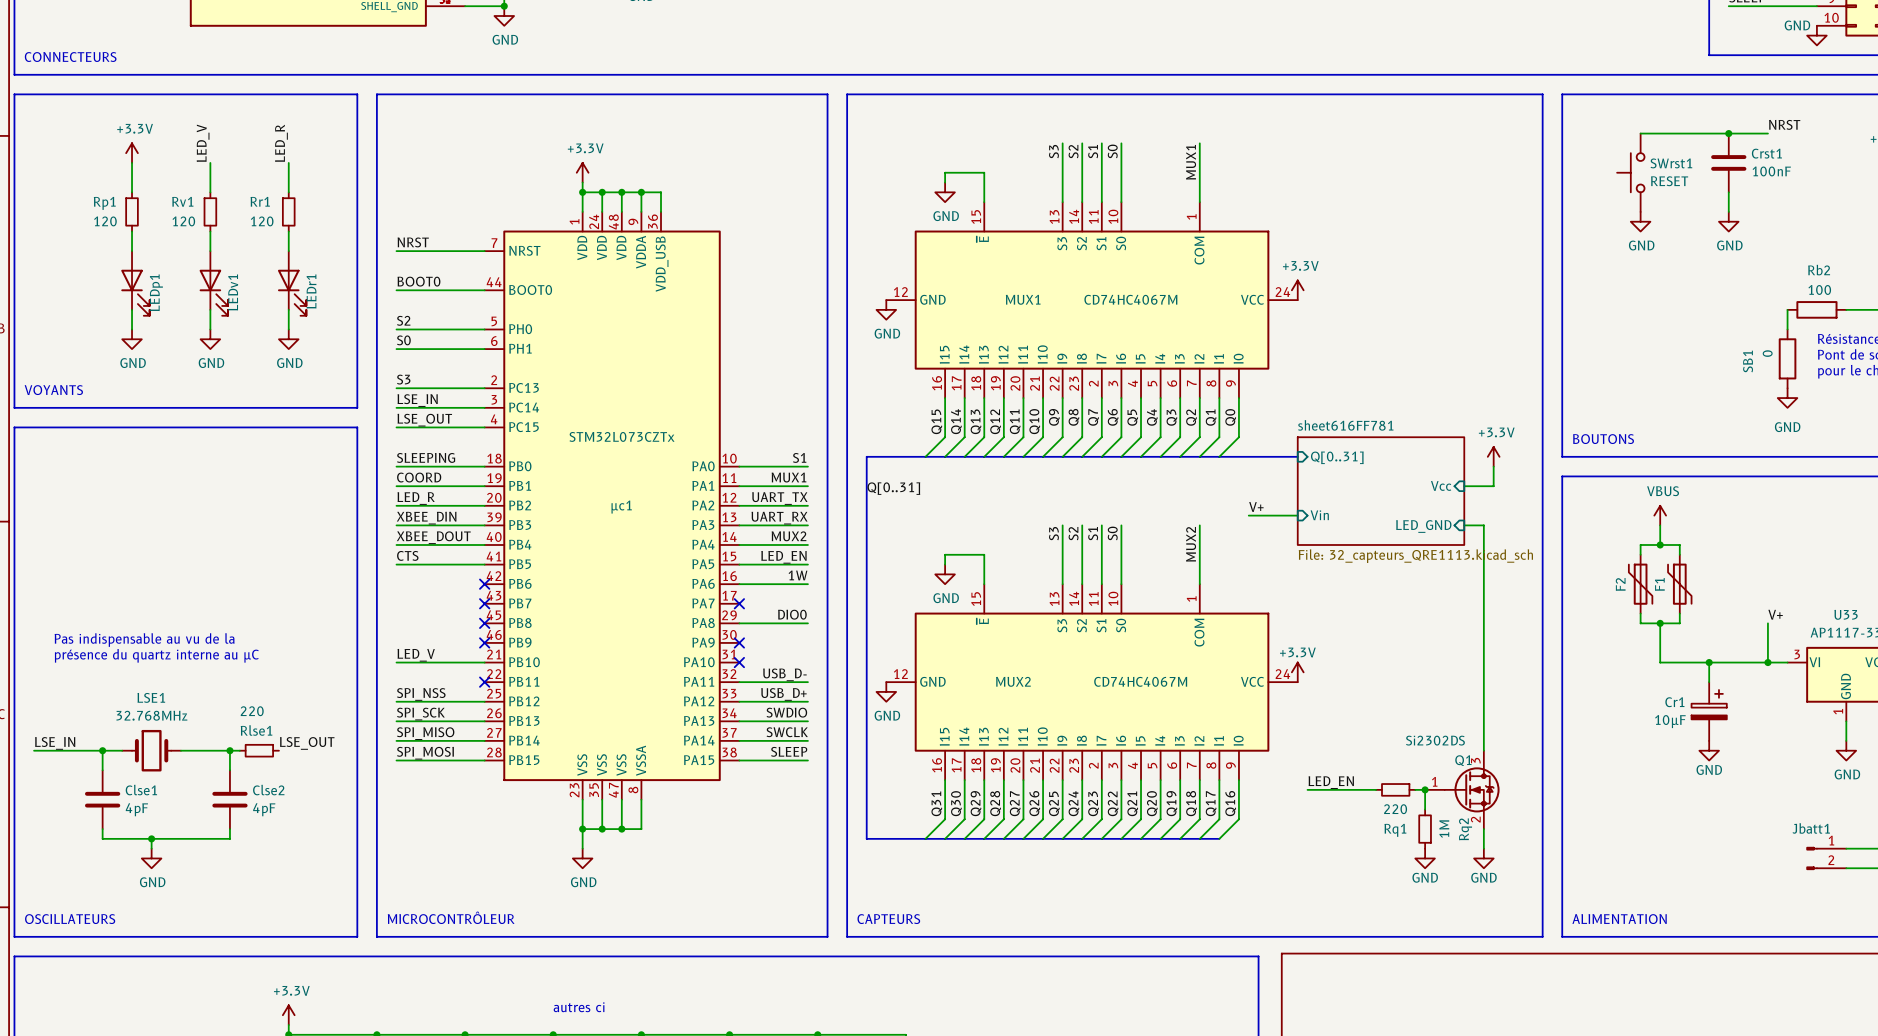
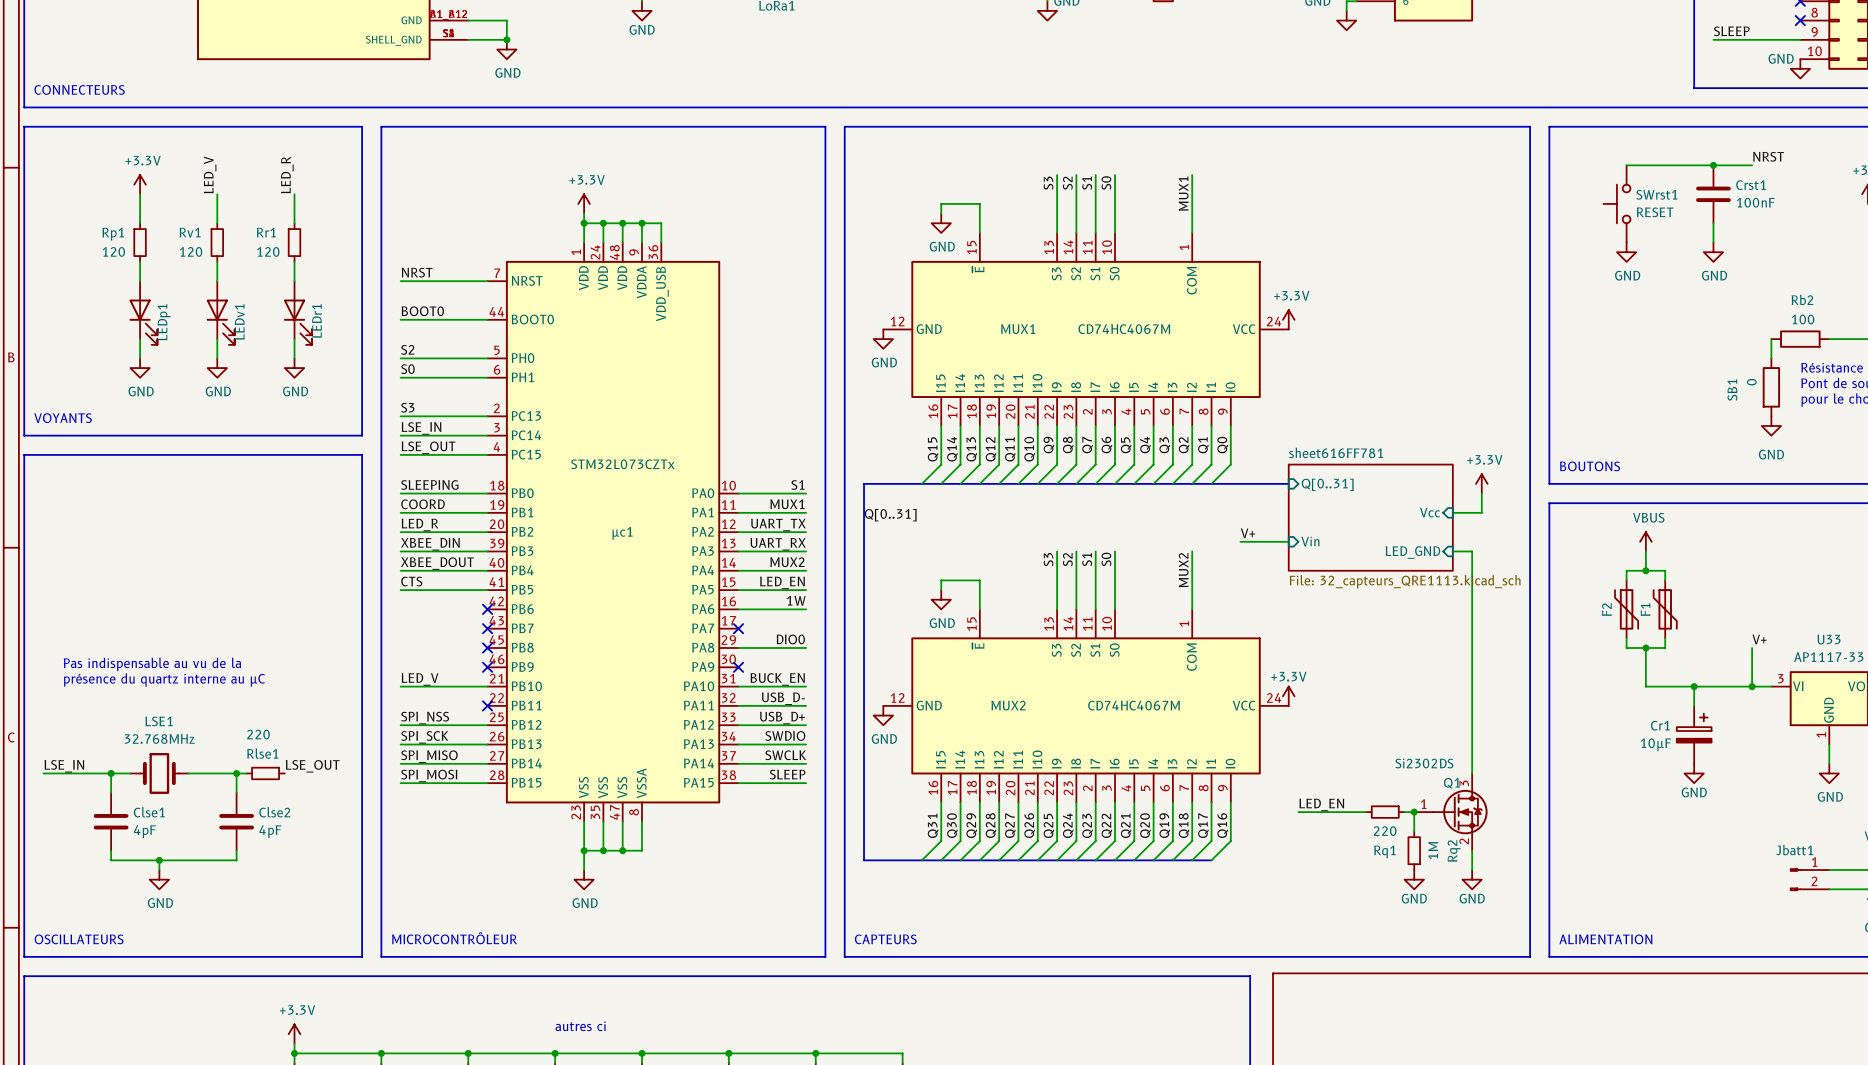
label: none -> BUCK_EN (777, 679)
wire: none -> (738, 686) (806, 686)
no-connect mark: (739, 662) -> none

